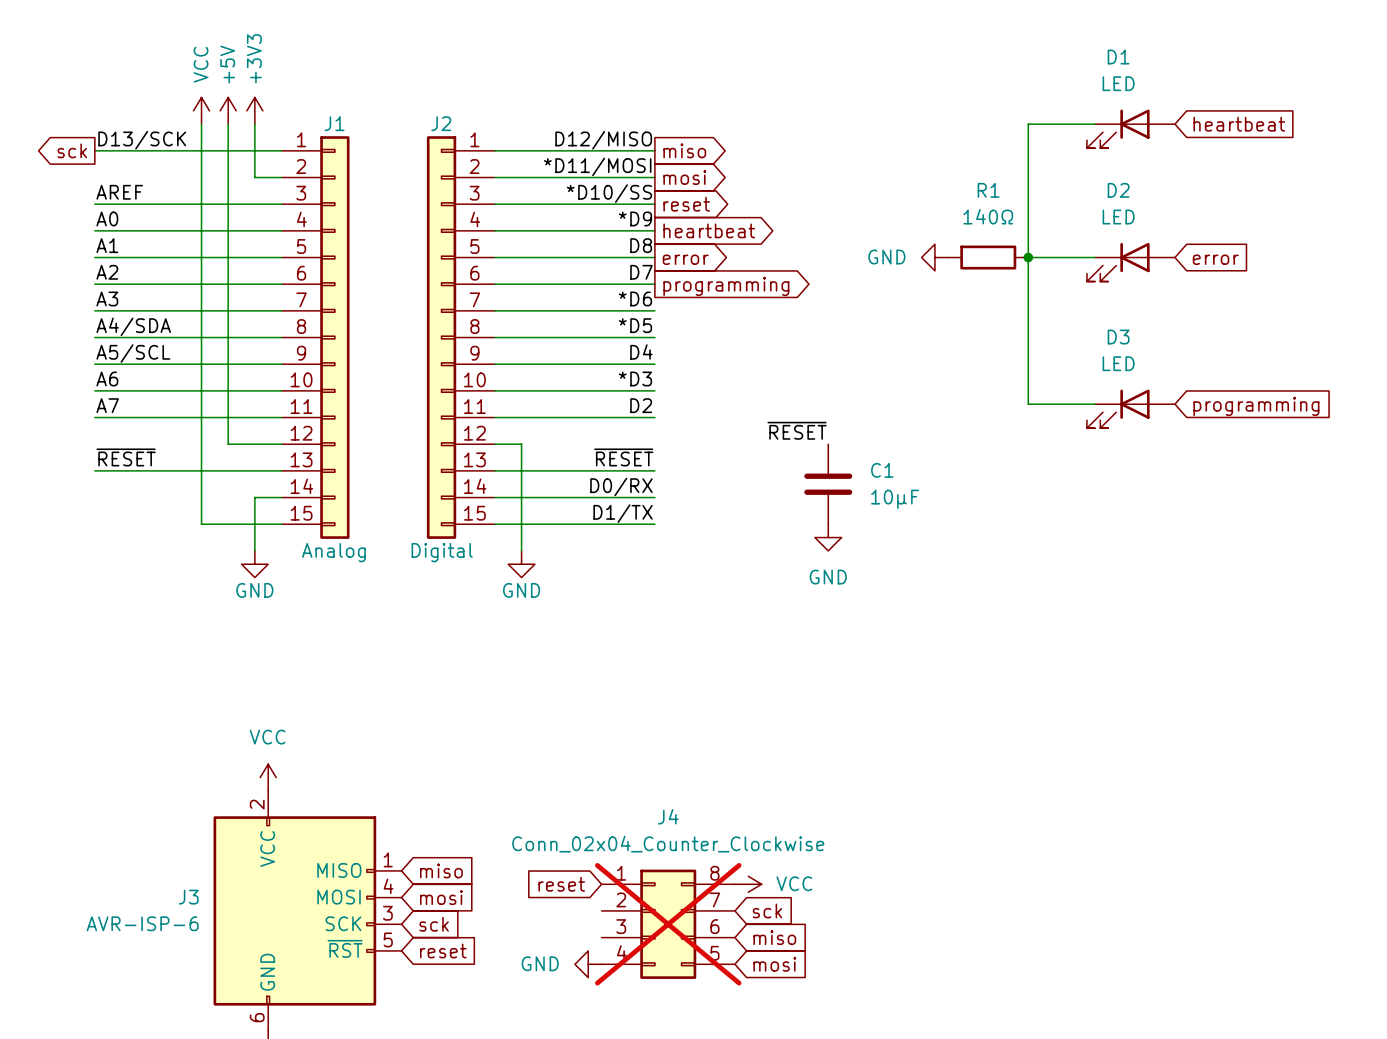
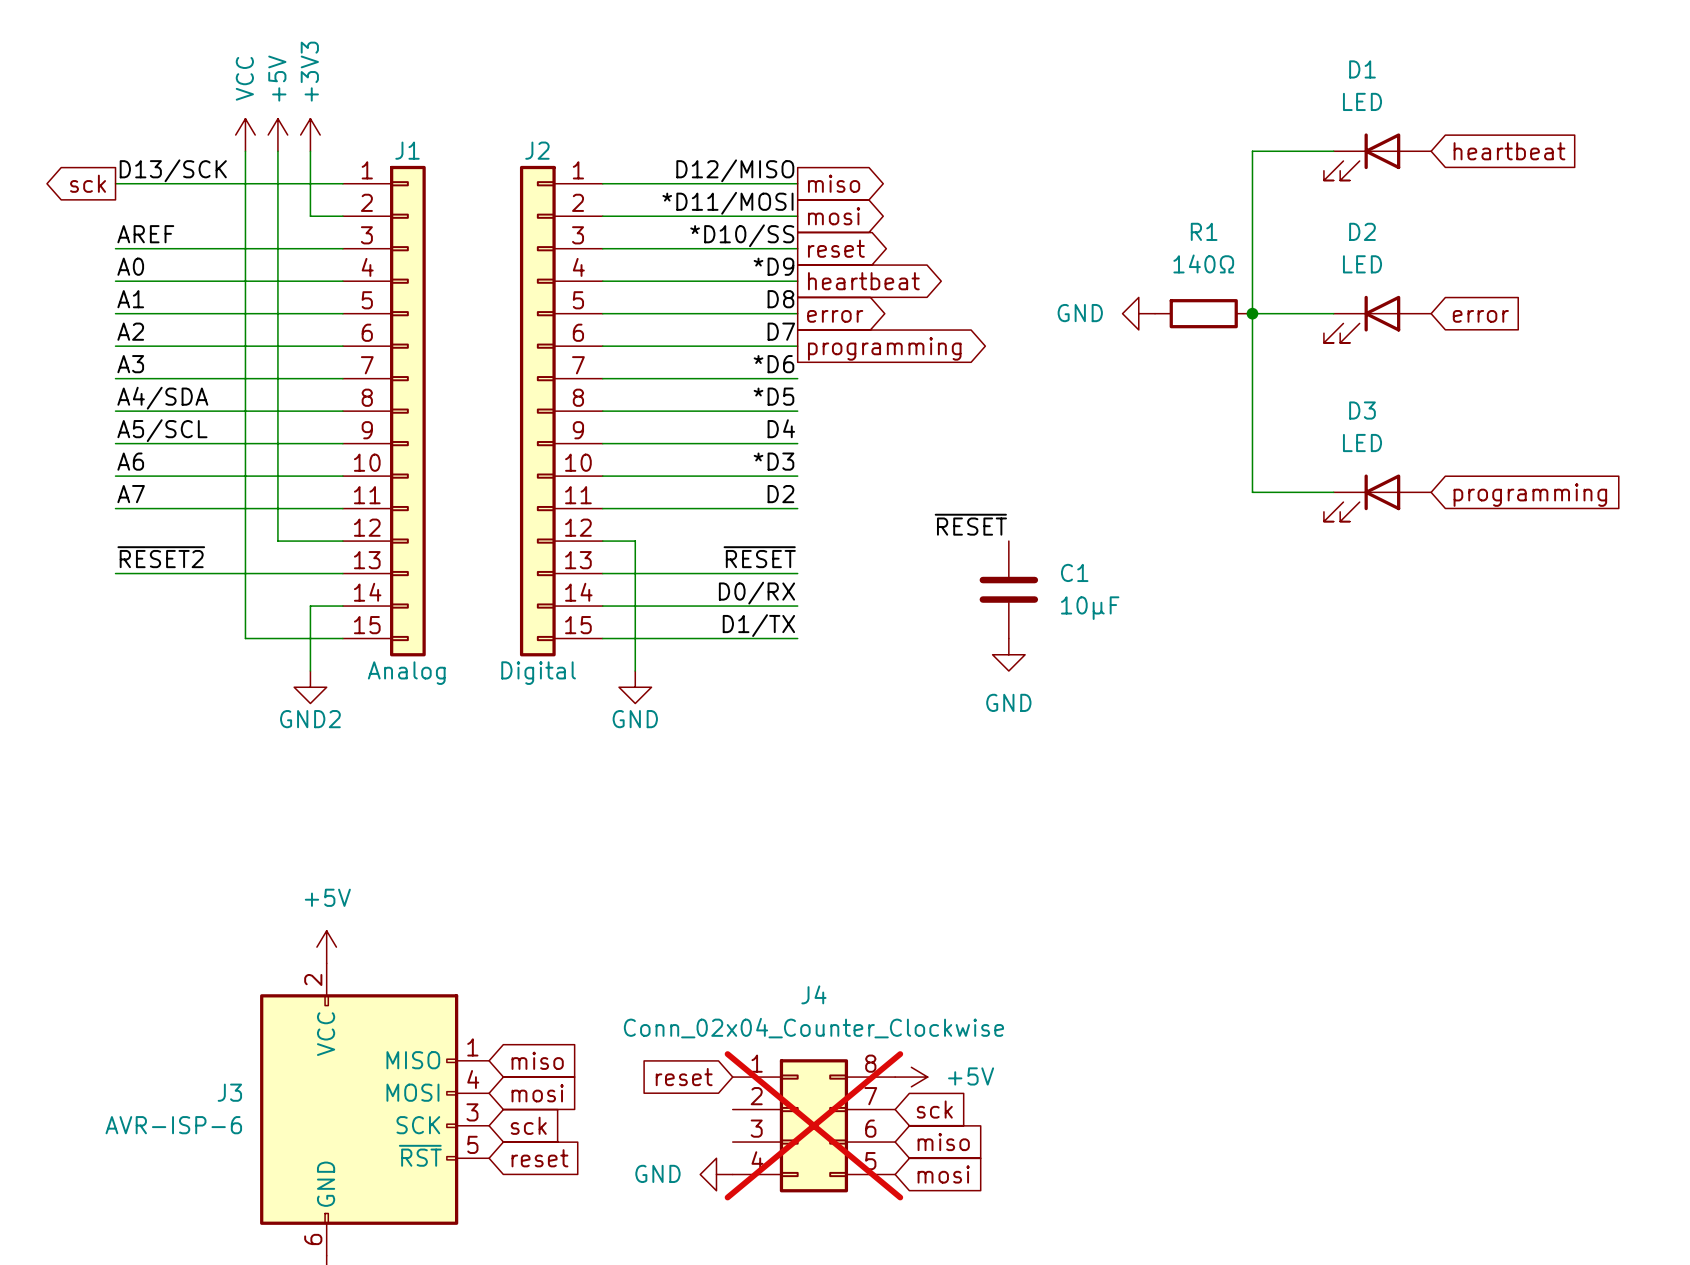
label: ~{RESET} (126, 457) -> ~{RESET2} (161, 557)
power symbol: GND (254, 564) -> GND2 (310, 687)
power symbol: VCC (268, 777) -> +5V (326, 947)
power symbol: VCC (748, 884) -> +5V (911, 1077)

